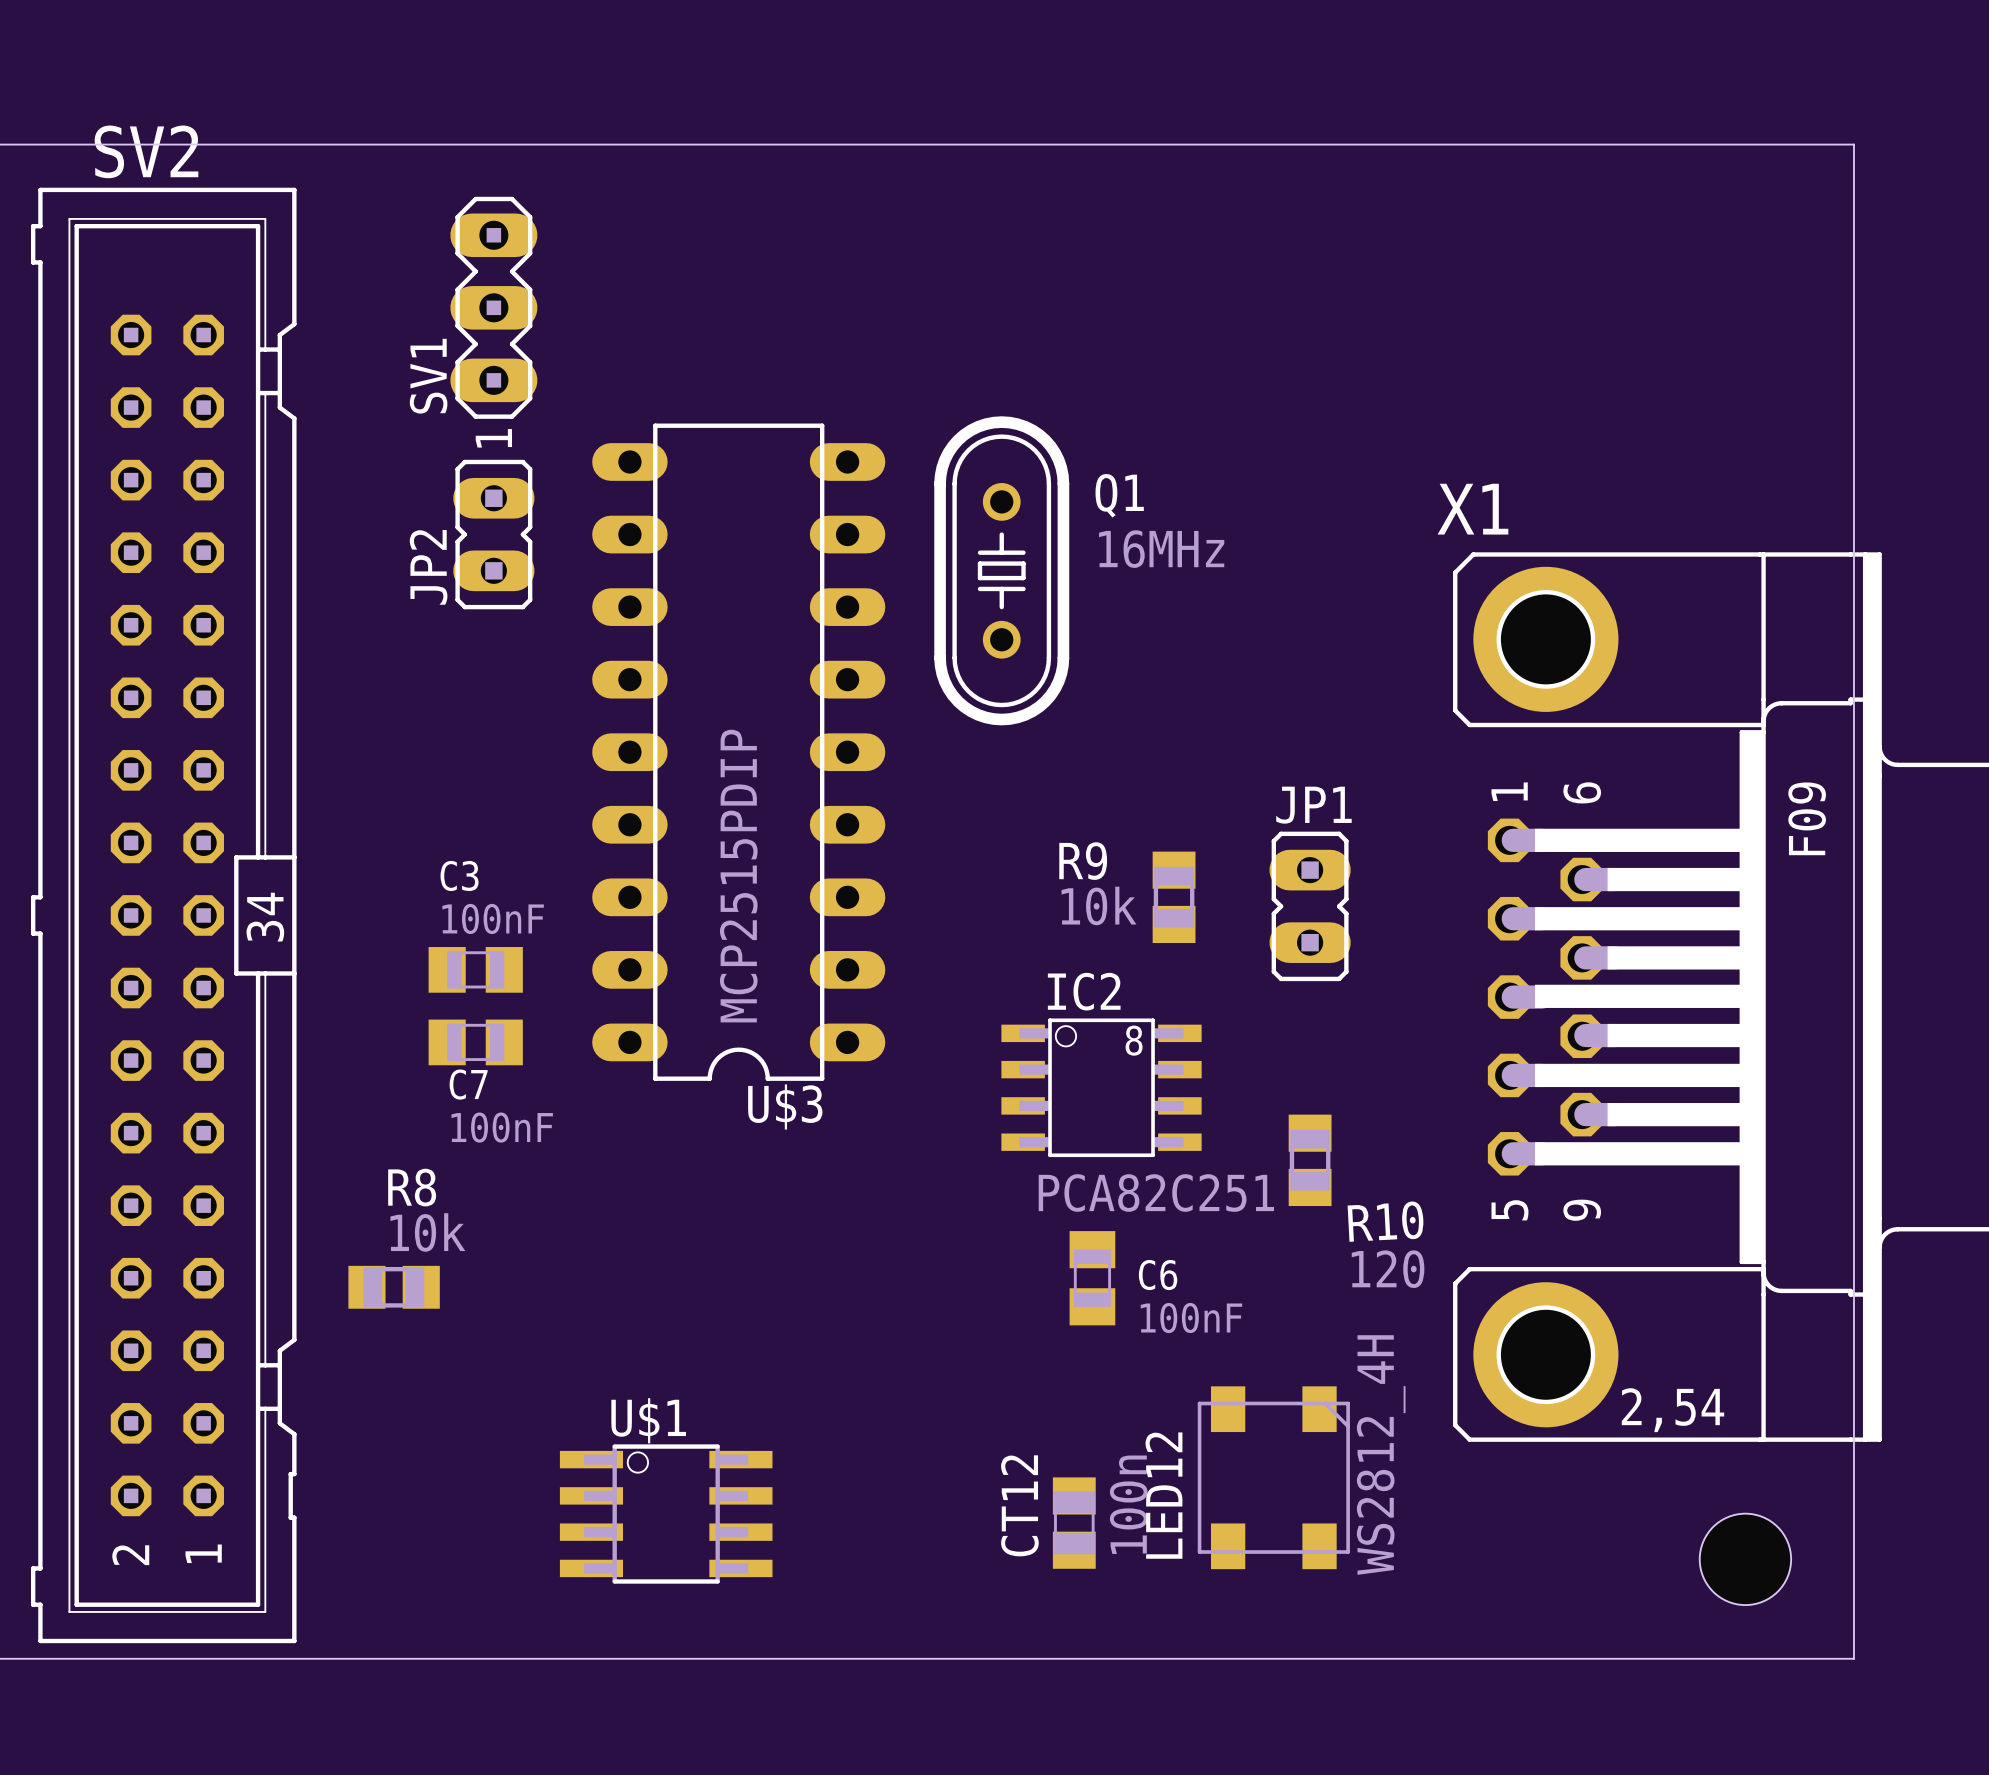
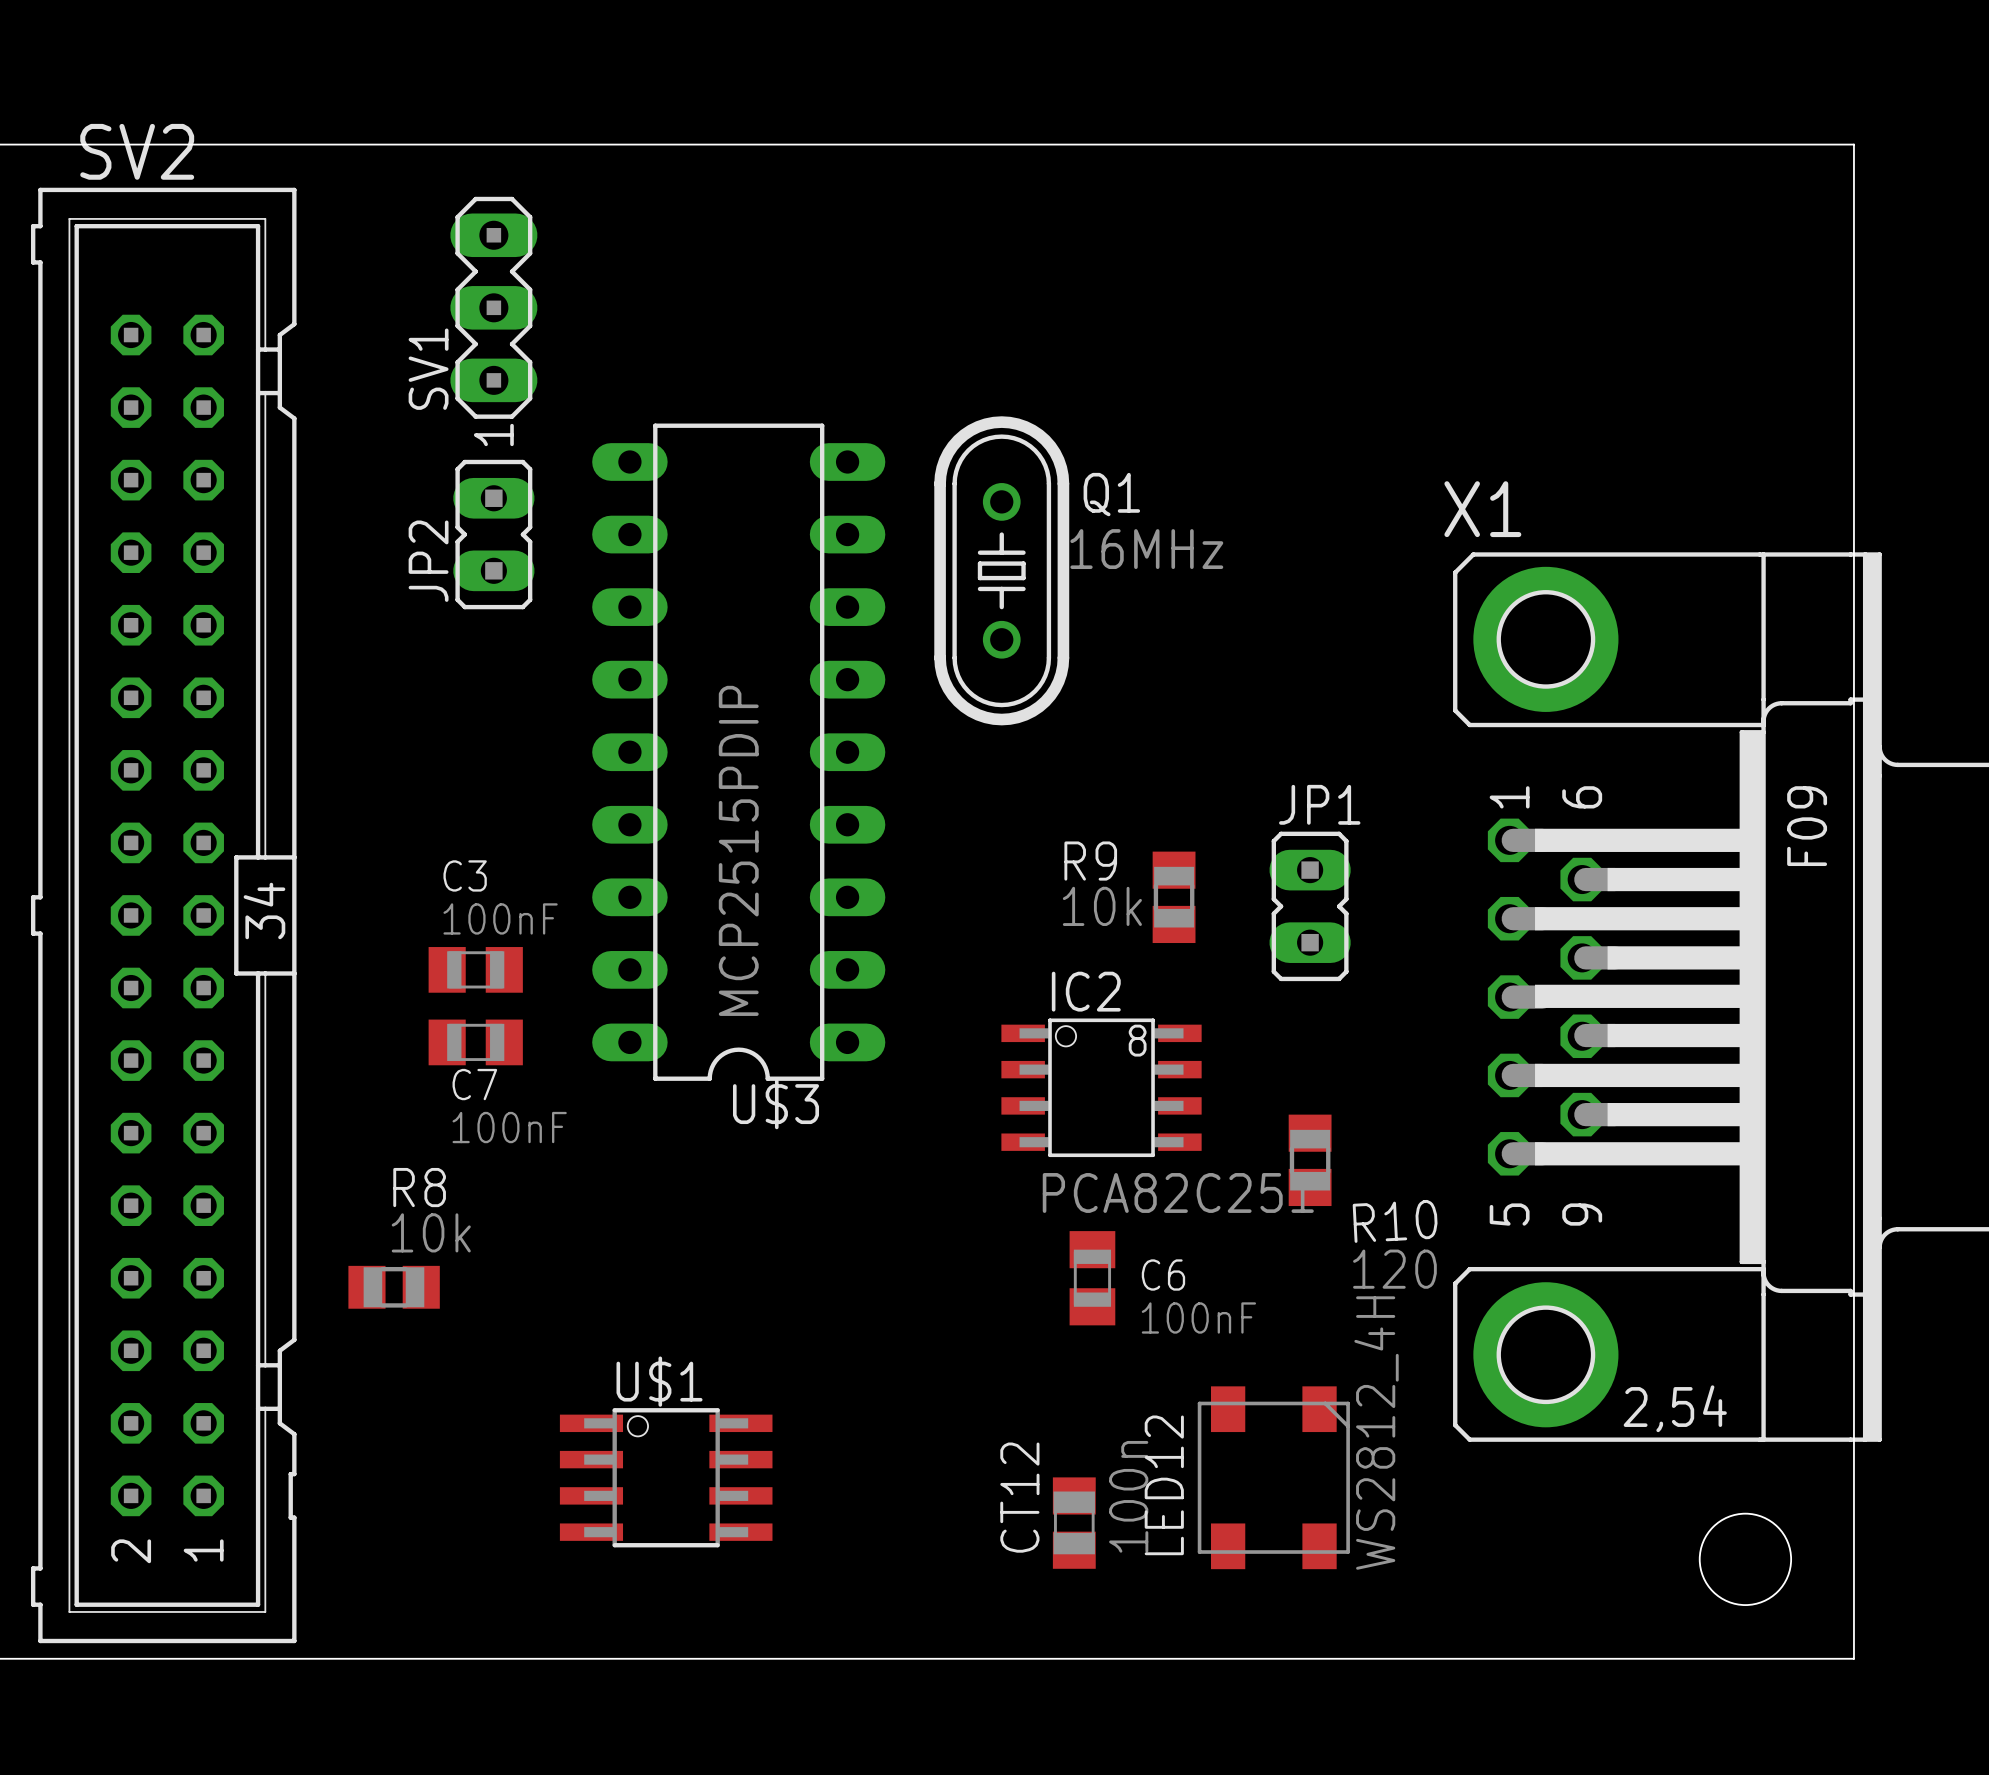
U$1 position: (666, 1514) -> (666, 1477)

